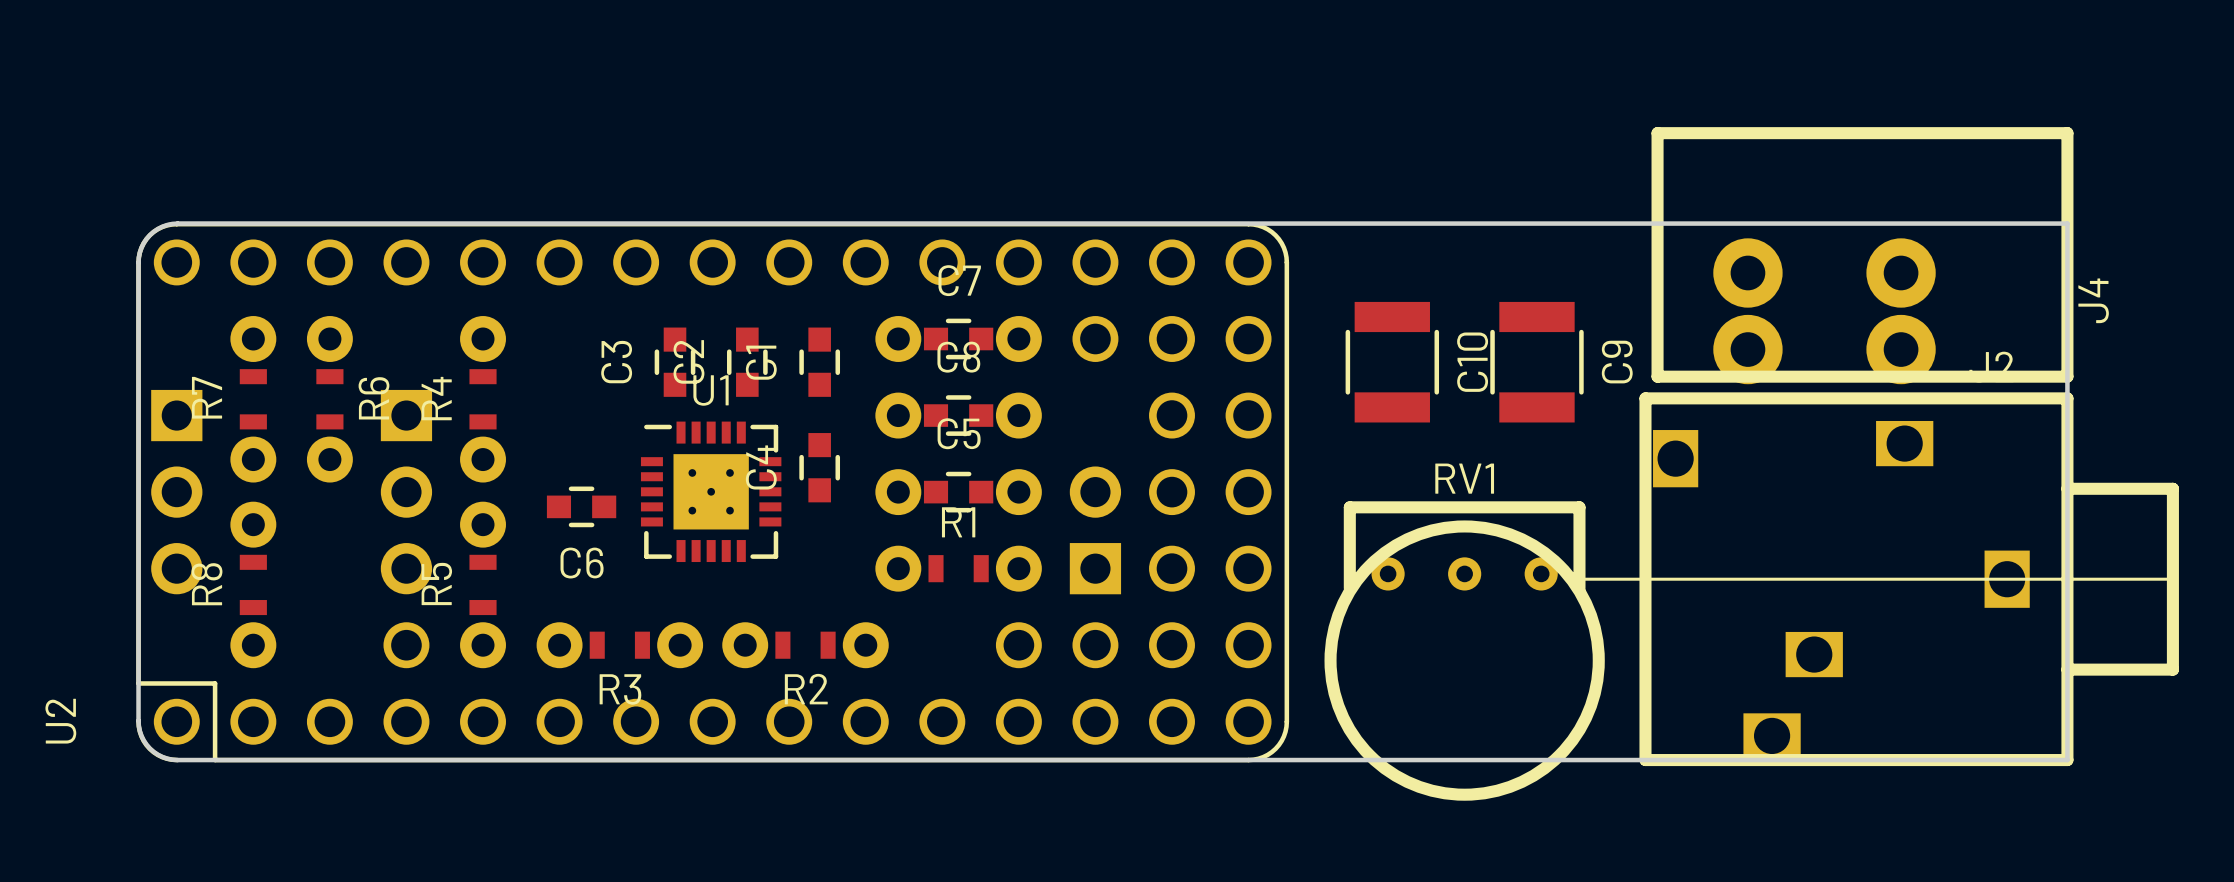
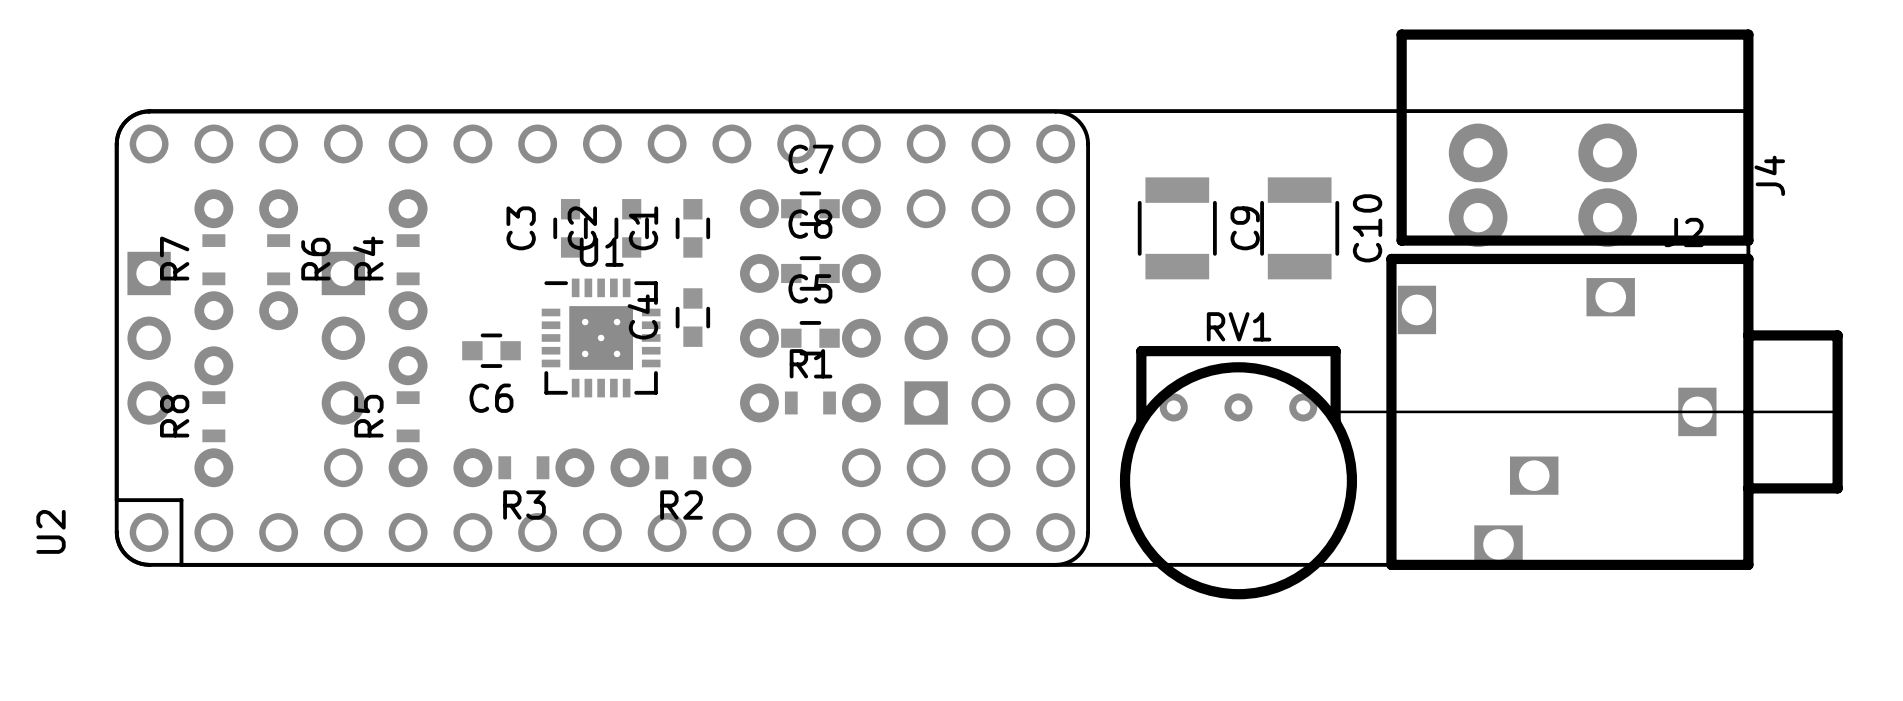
C10 name: C10 (1472, 362) -> C9 (1245, 228)
C9 name: C9 (1617, 362) -> C10 (1367, 228)

